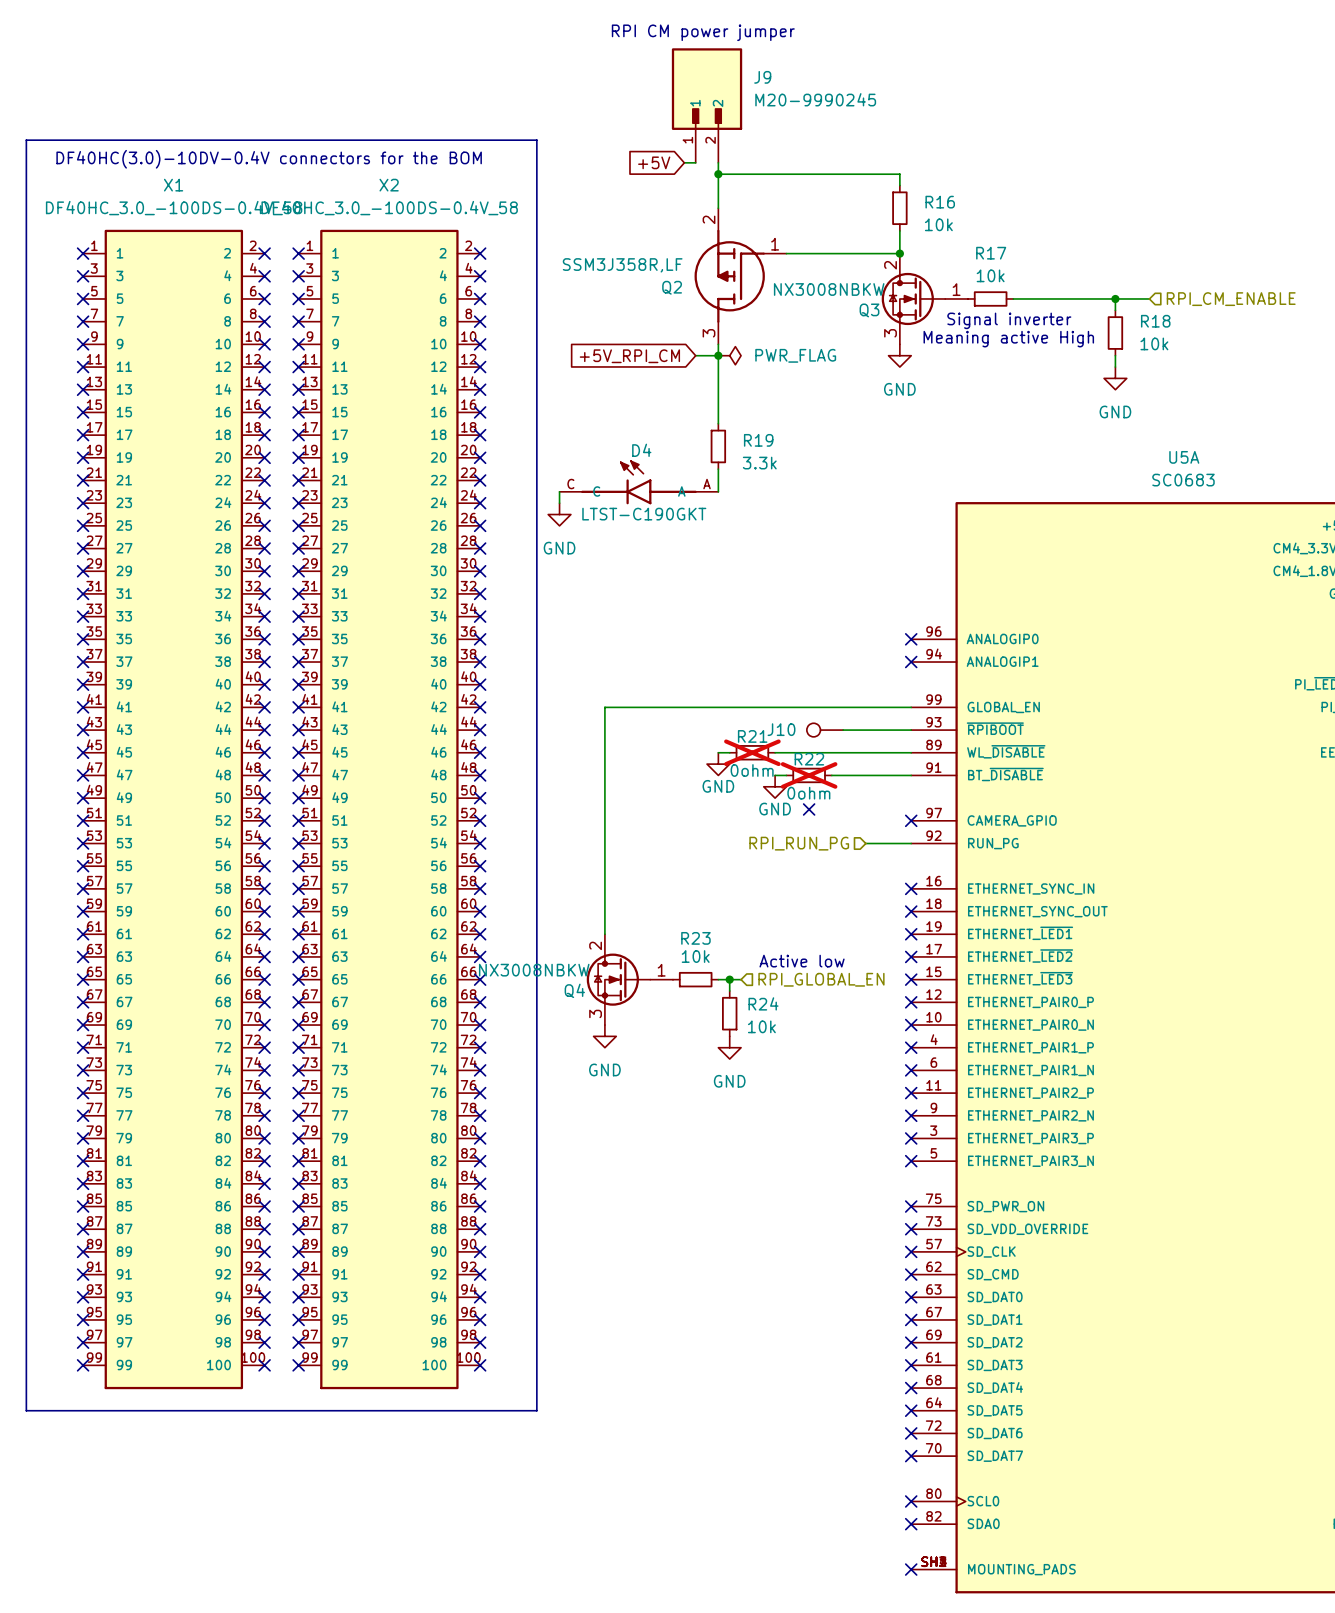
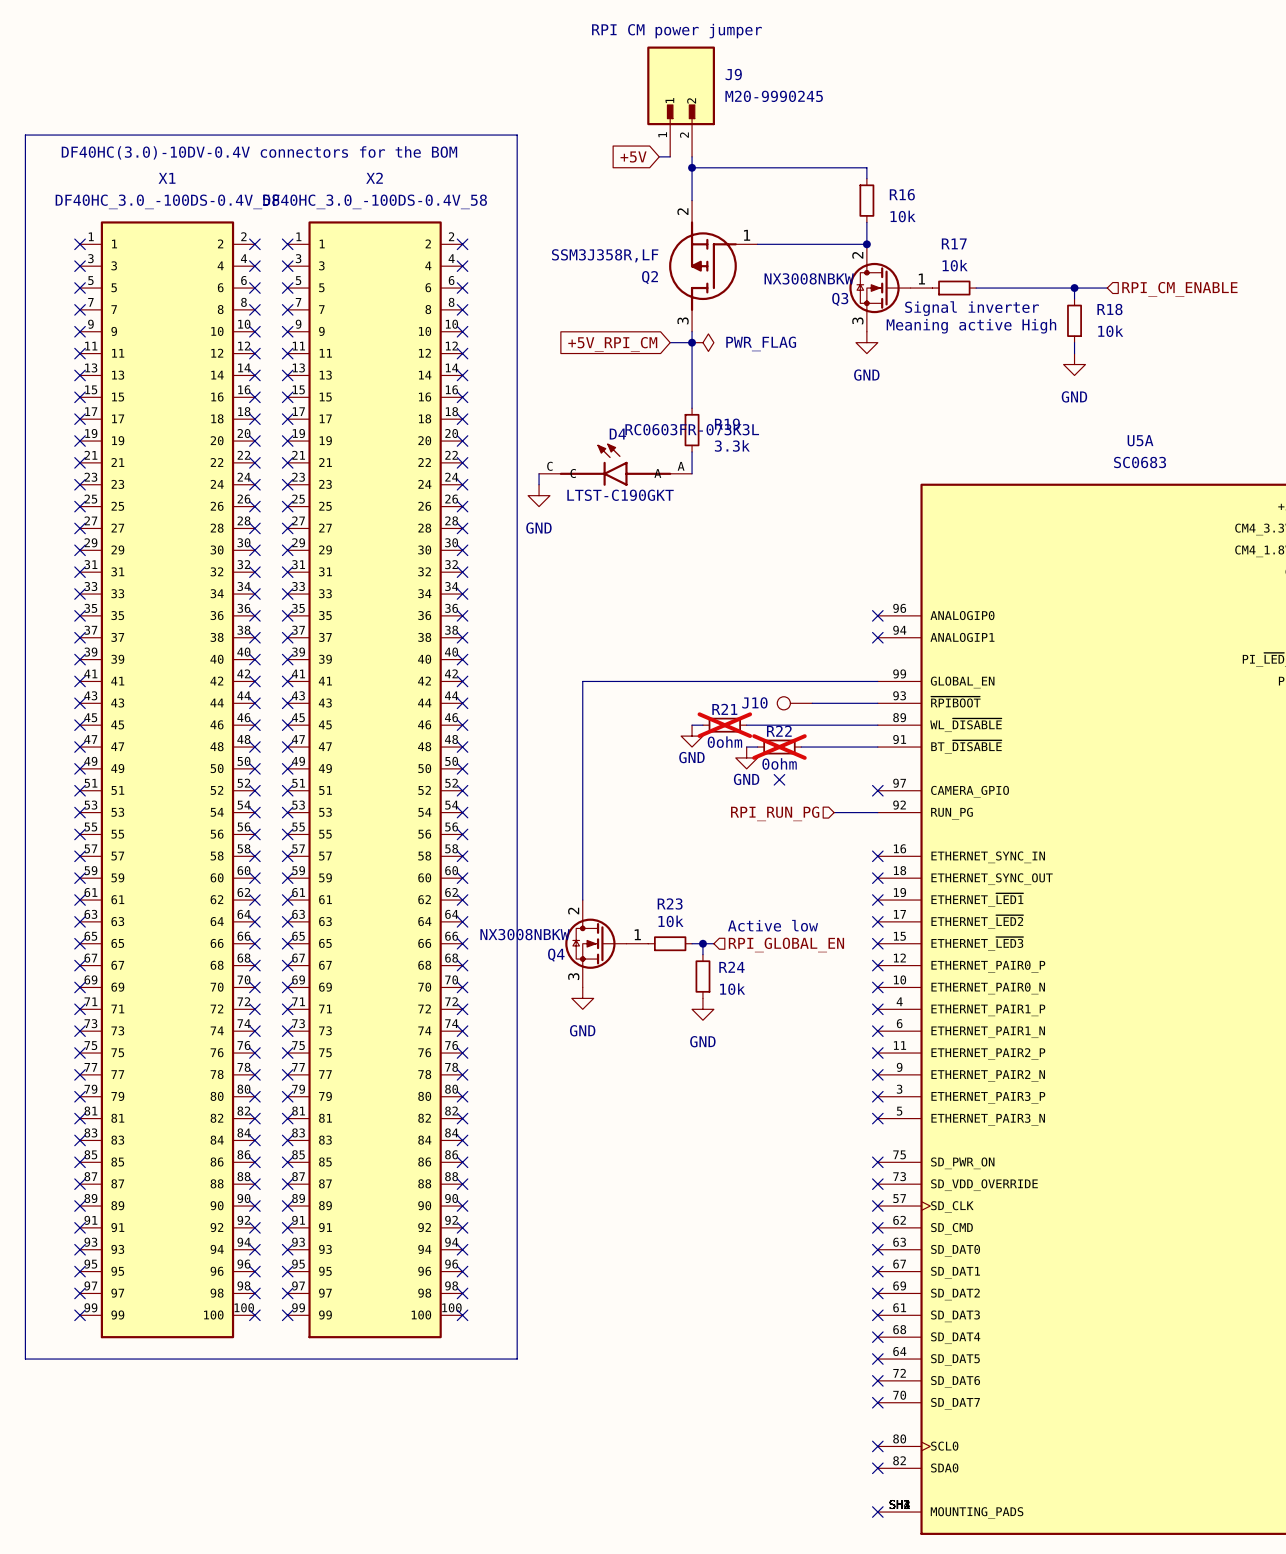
R19 text: none -> RC0603FR-073K3L (692, 429)

